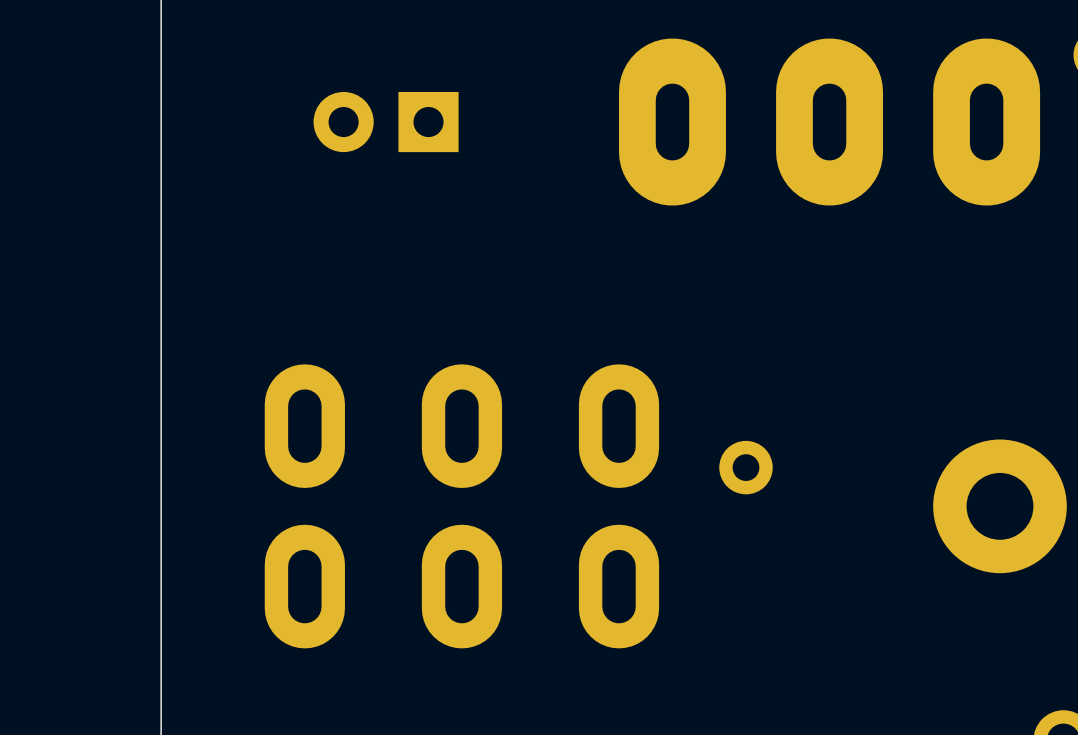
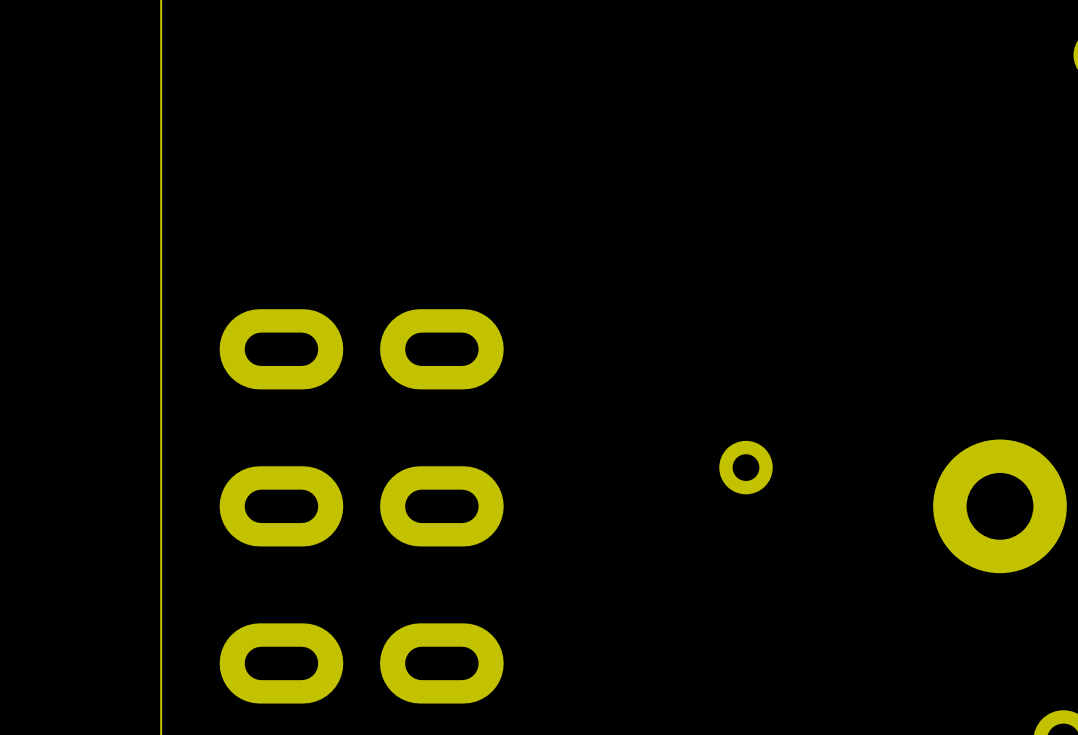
part: (386, 122) -> none
part: (829, 122) -> none
part rotation: 0° (461, 506) -> 90° clockwise (361, 506)

